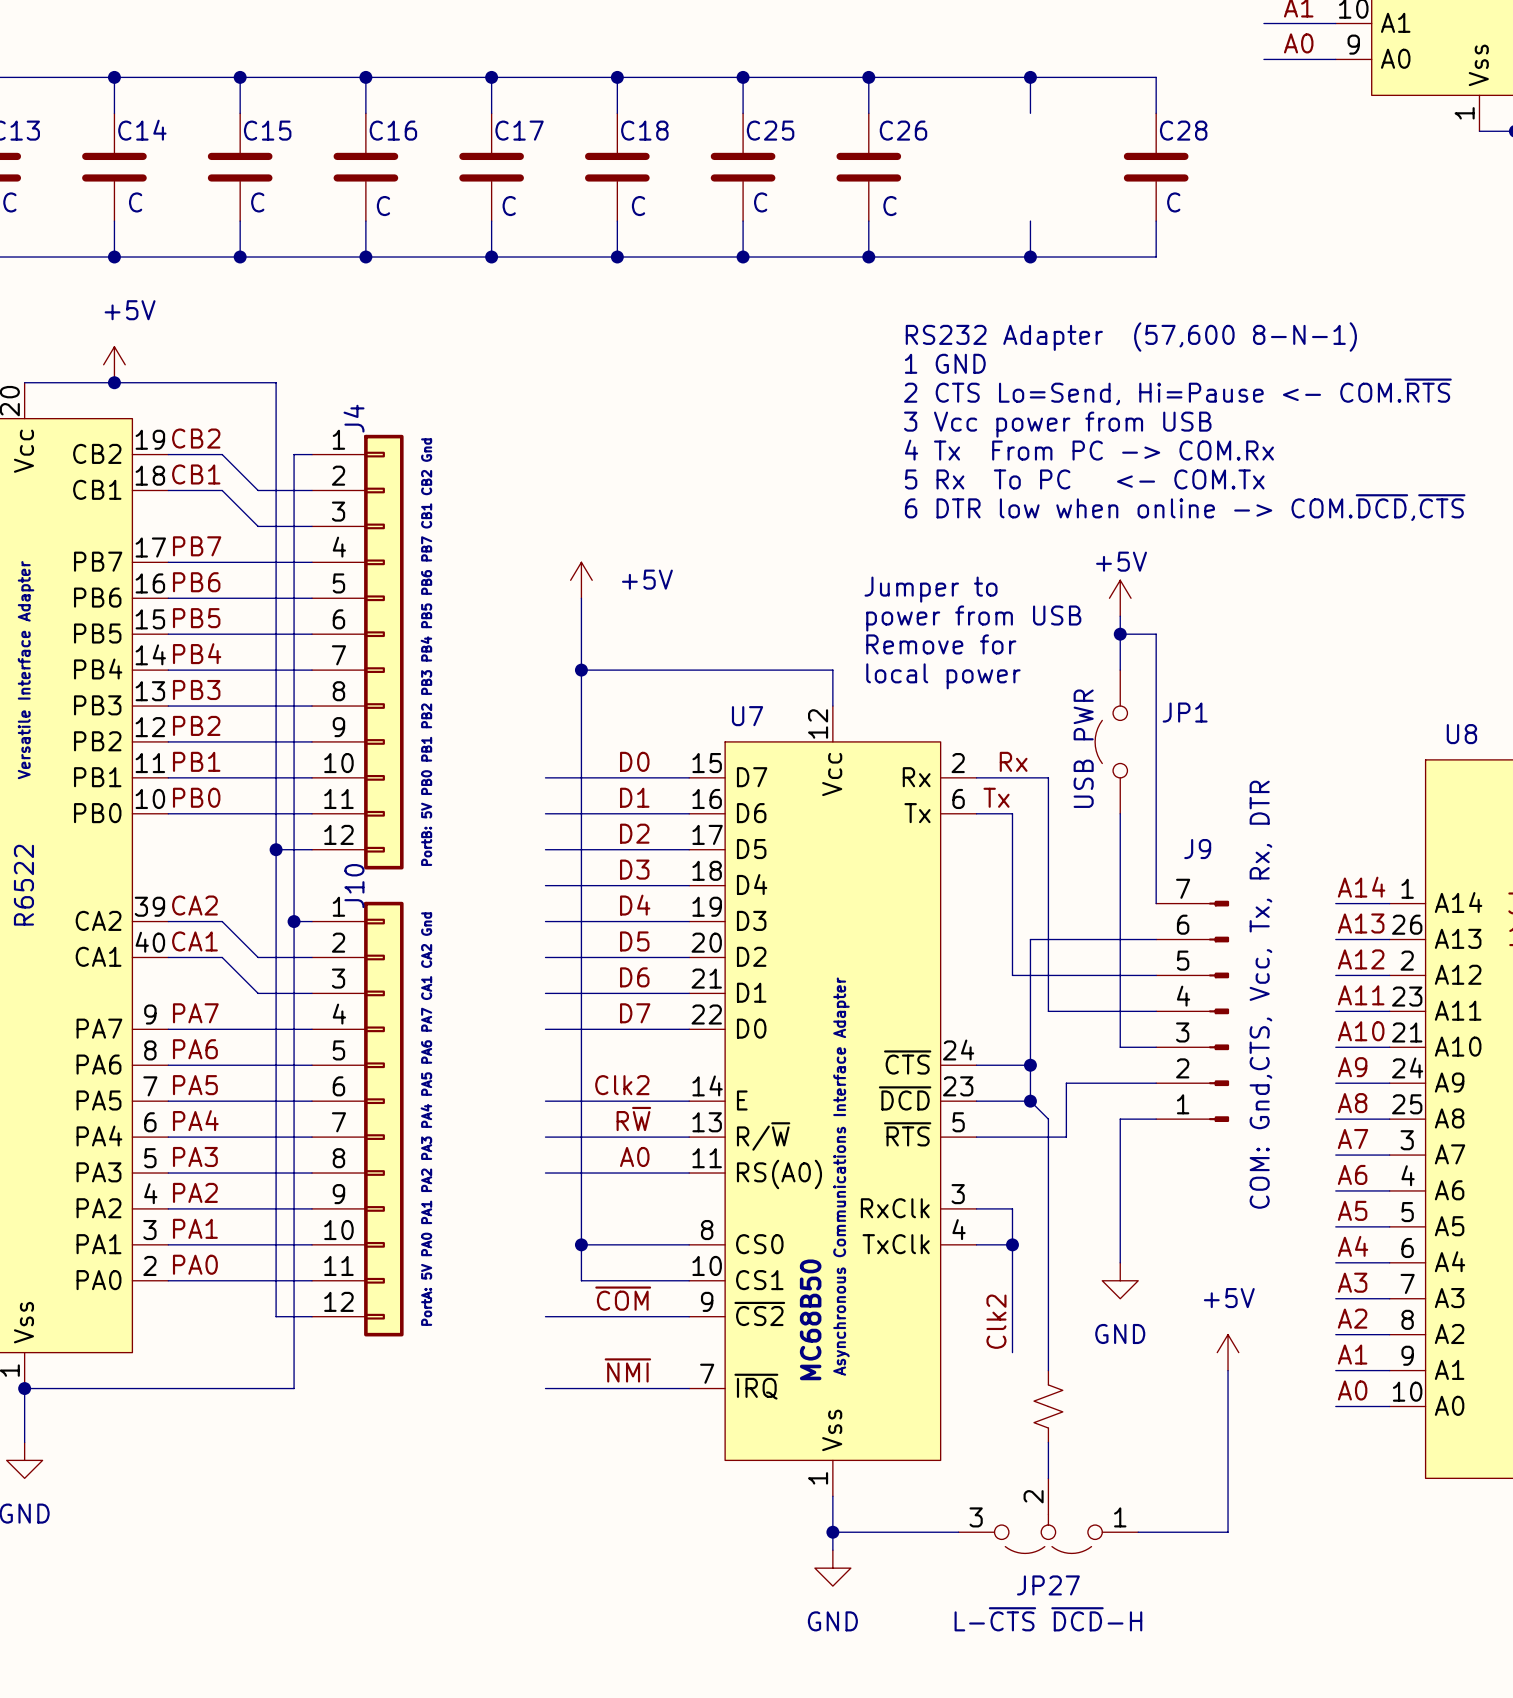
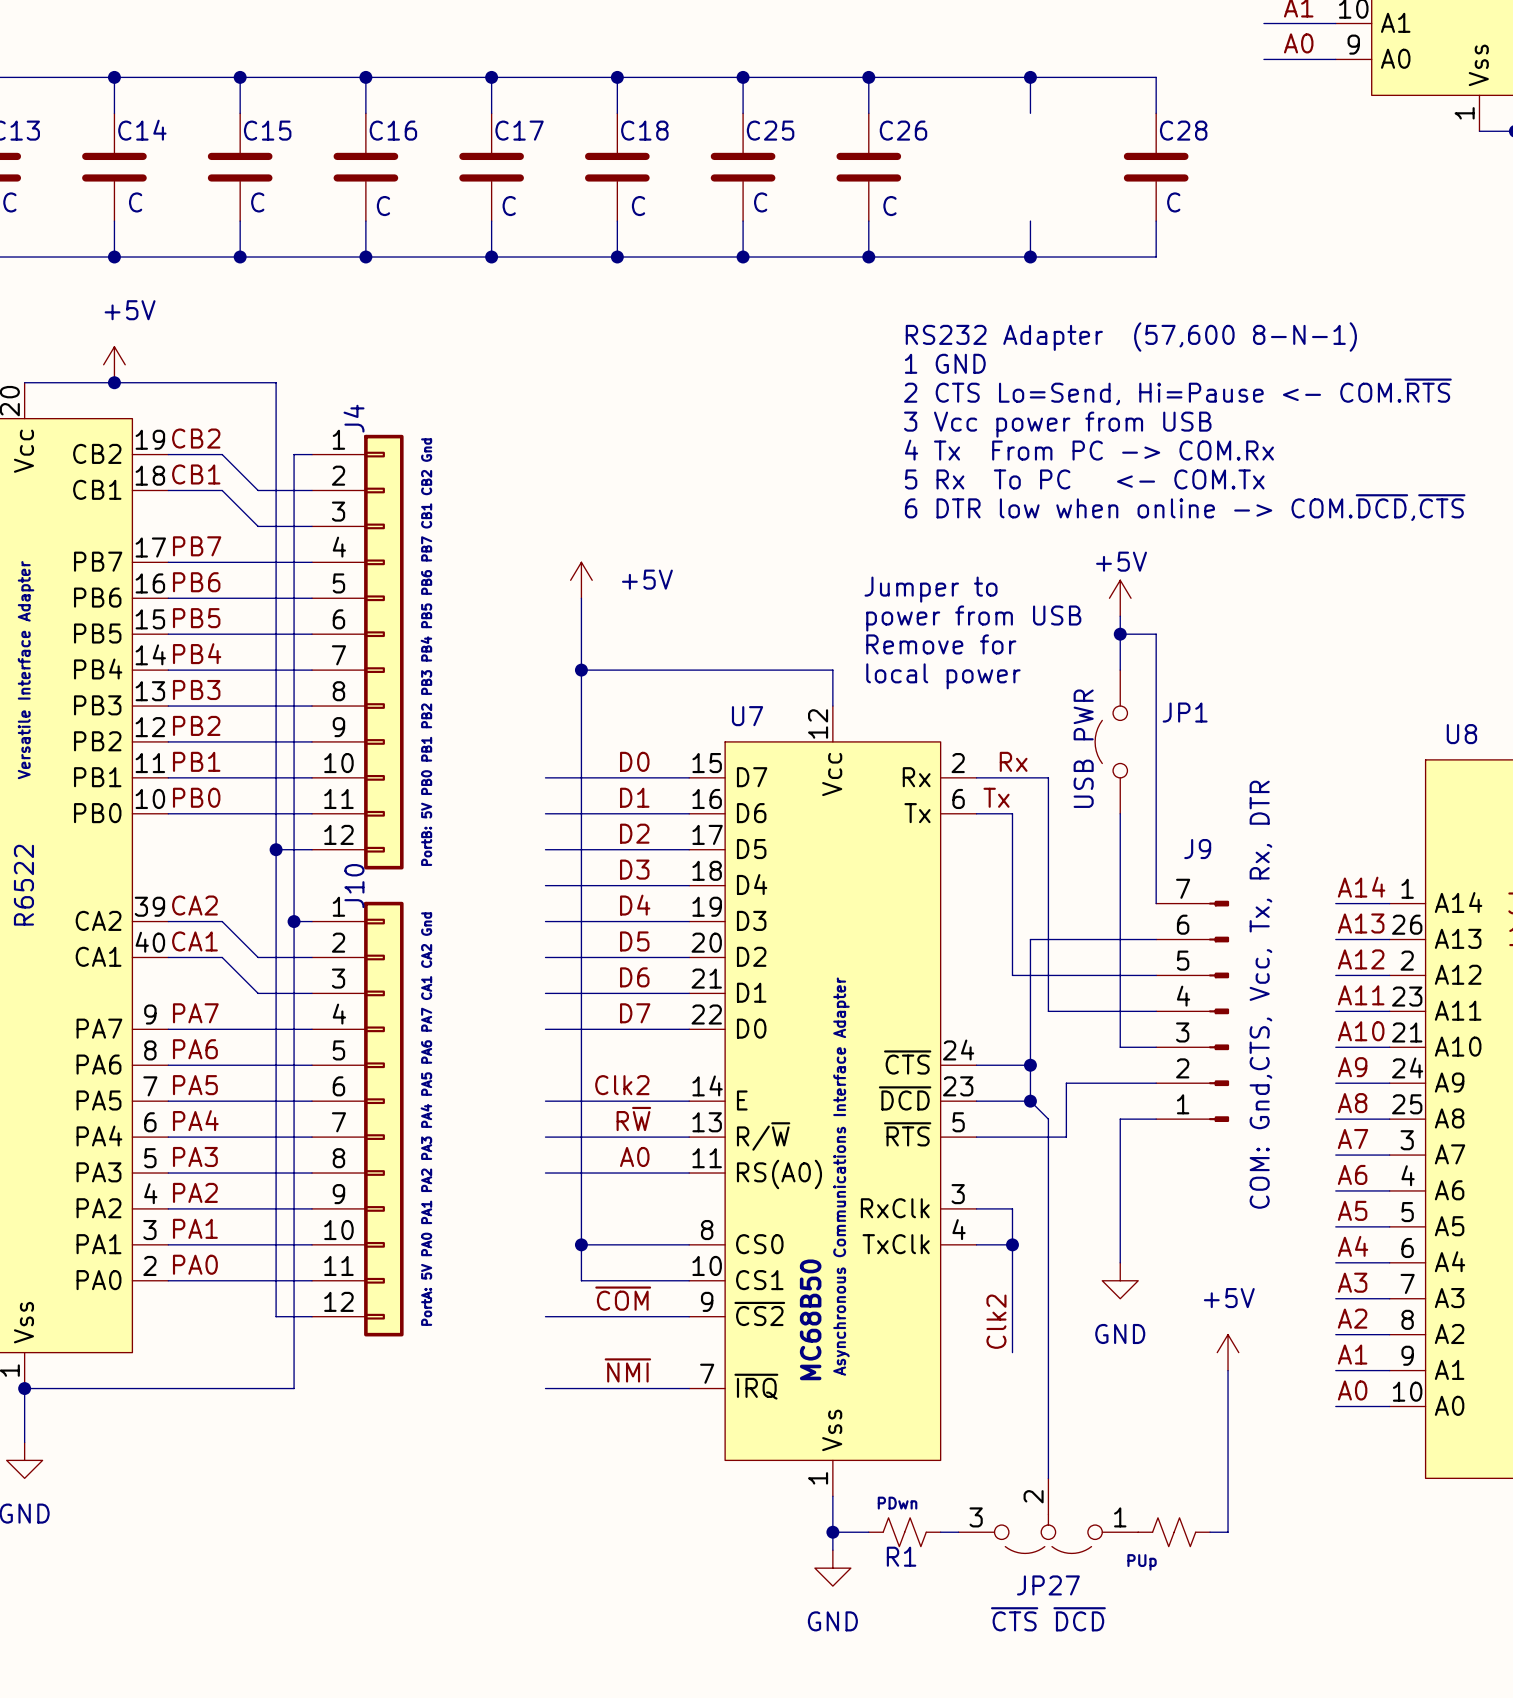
wire: none -> (1048, 1370) (1048, 1442)
part: (1048, 1406) -> none
wire: (868, 1532) (940, 1532) -> none
R1: none -> PDwn (904, 1532)
wire: (1138, 1532) (1210, 1532) -> none
part: none -> PUp (1174, 1532)
JP27 value: L-~{CTS} ~{DCD}-H (1048, 1619) -> ~{CTS} ~{DCD} (1048, 1619)

